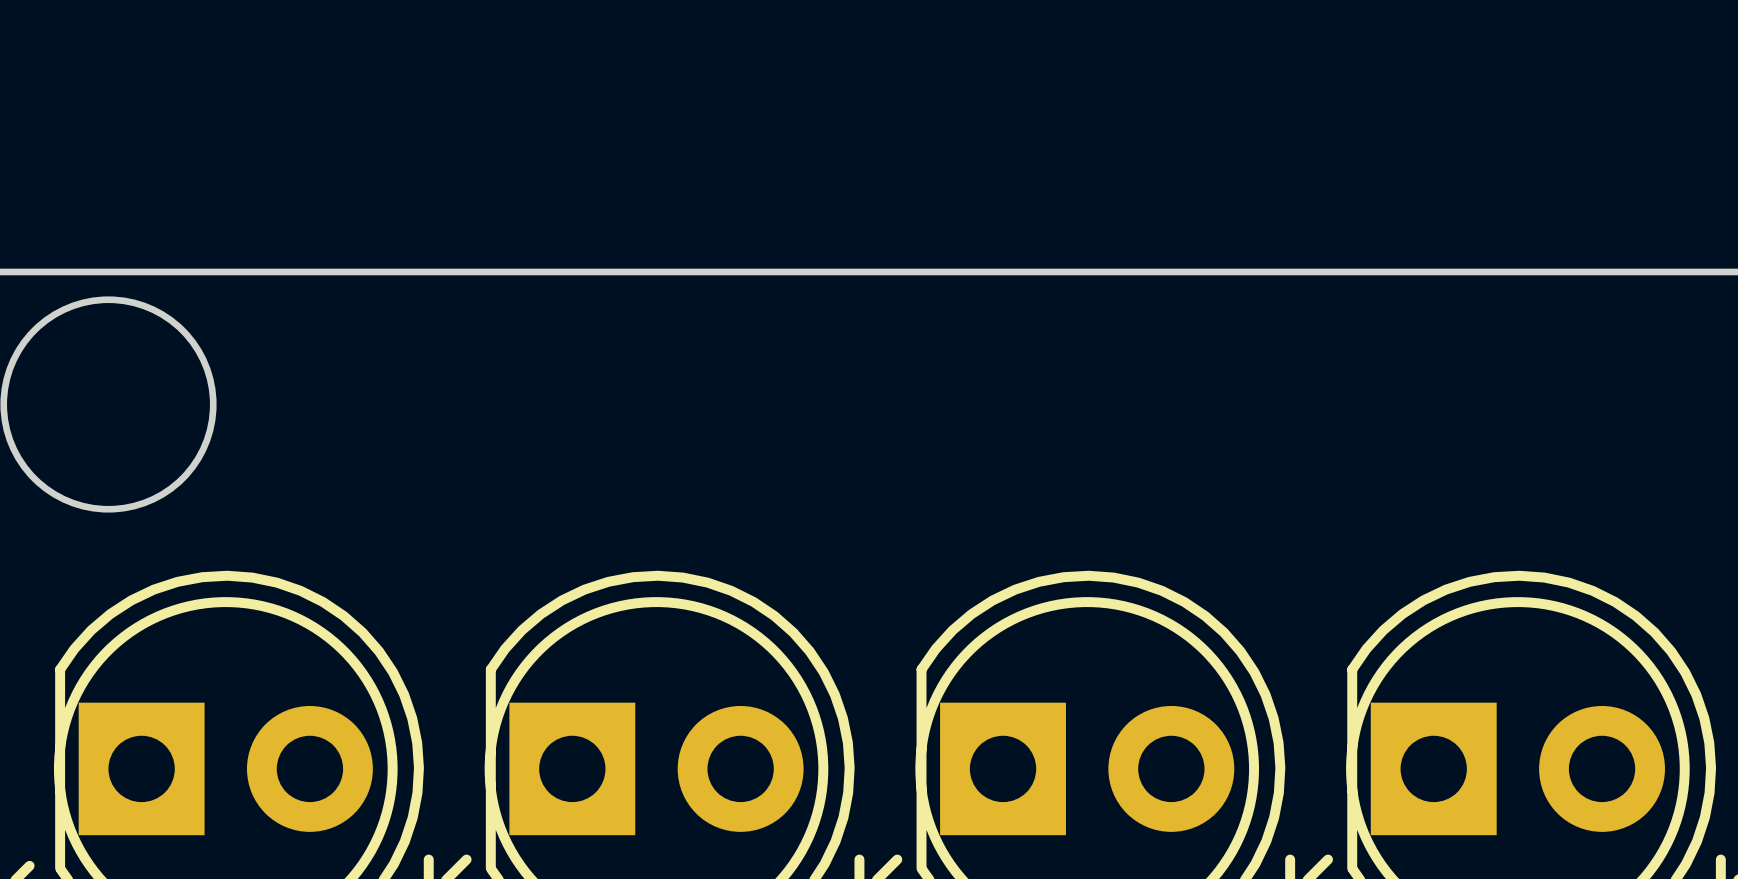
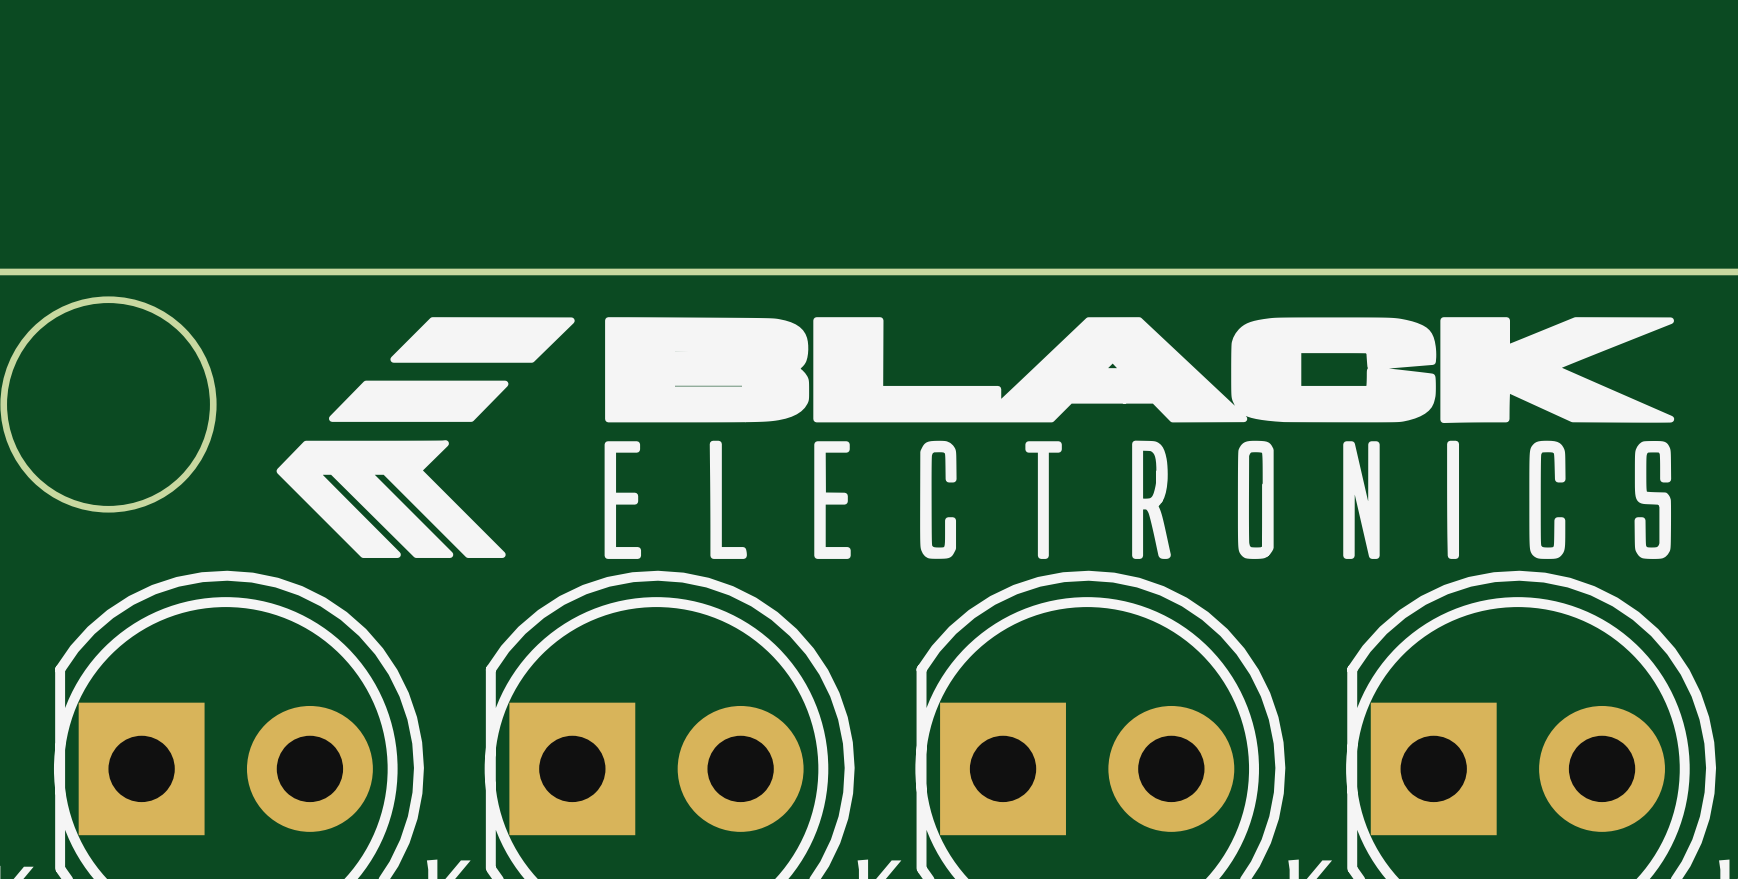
drawing: none -> [276, 317, 1675, 559]

